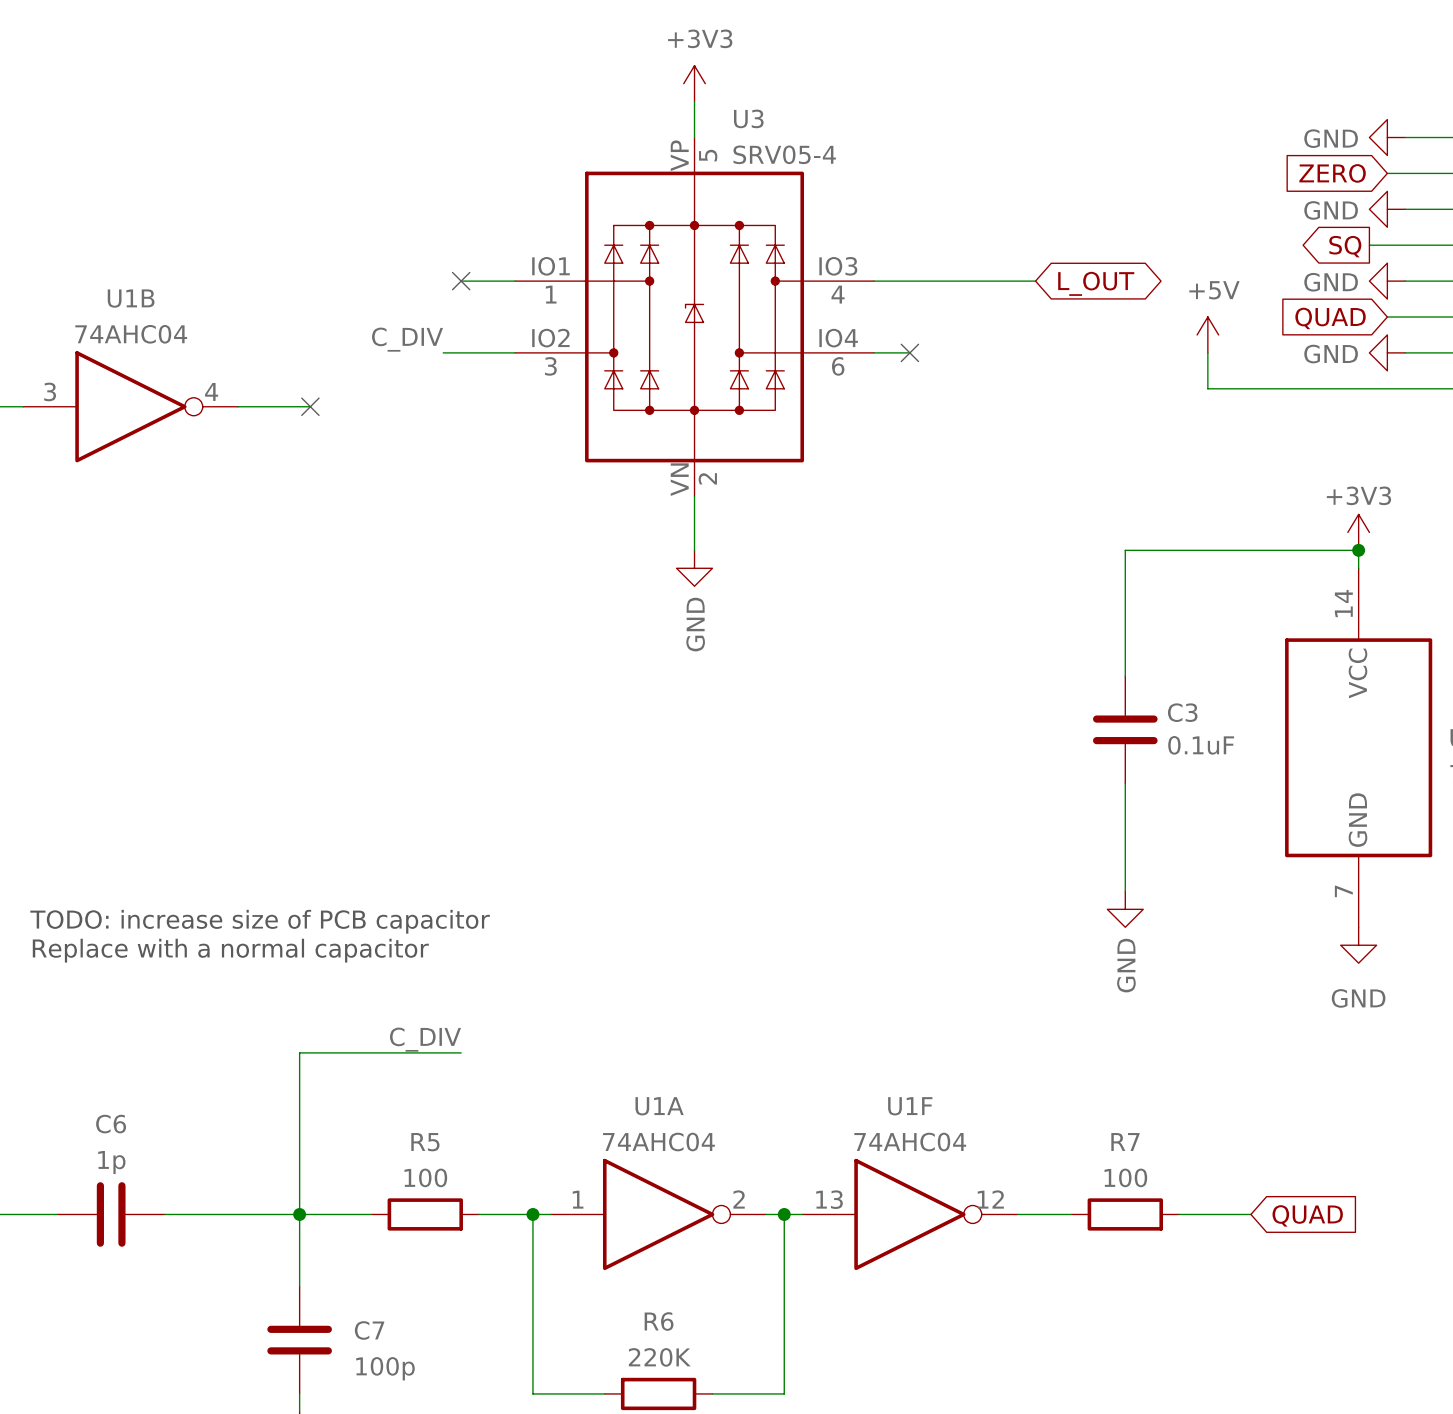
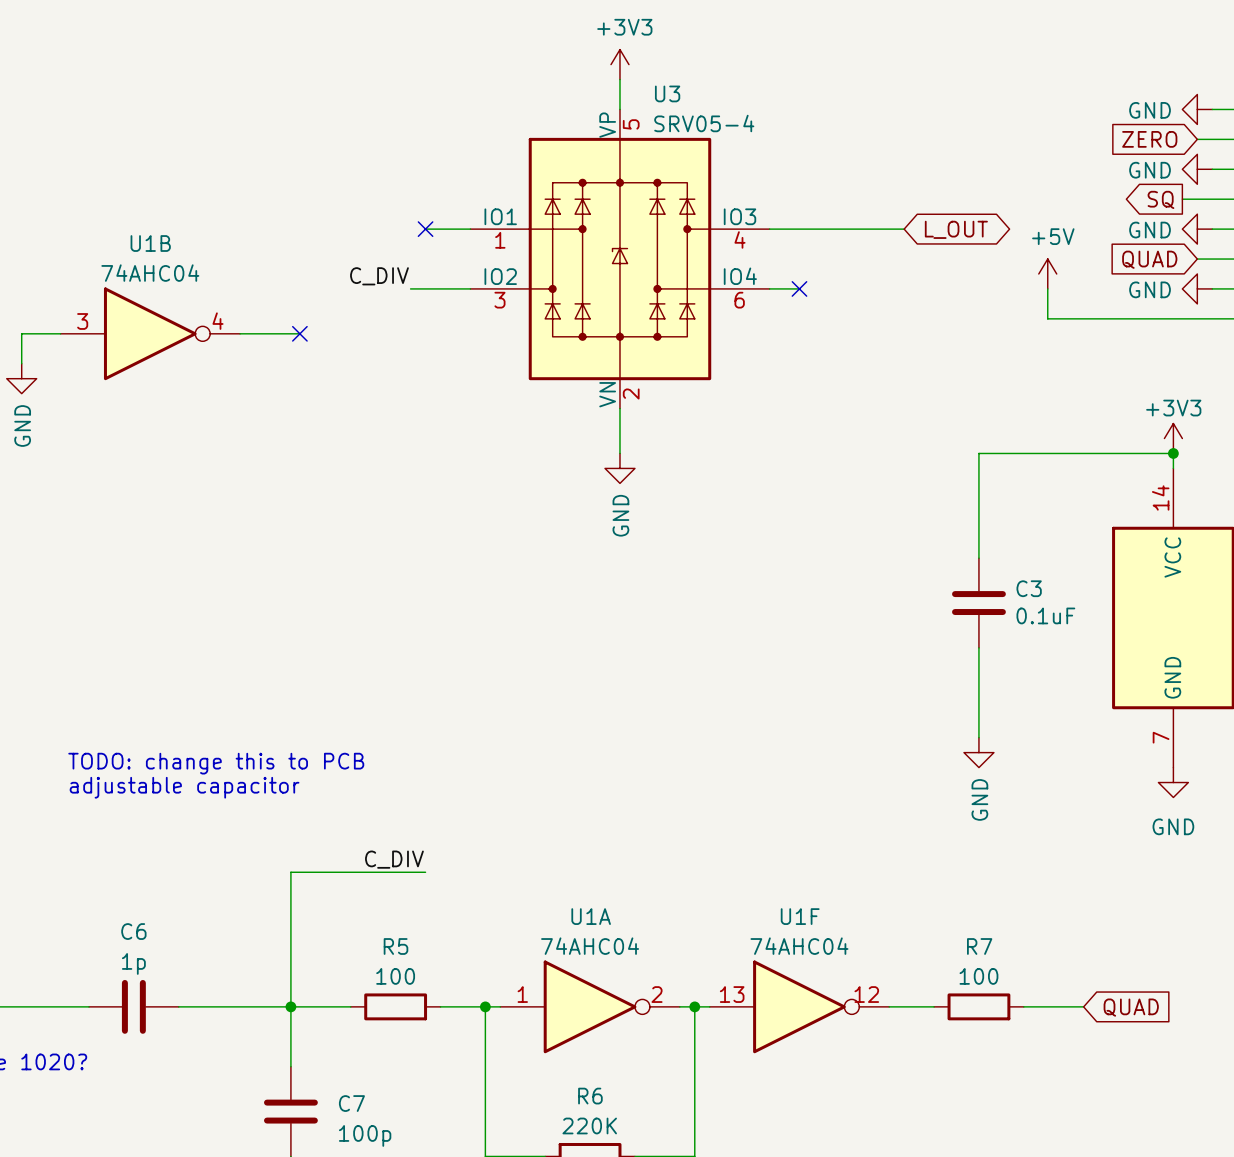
text: TODO: increase size of PCB capacitor (260, 921) -> TODO: change this to PCB (216, 763)
text: Replace with a normal capacitor (230, 950) -> adjustable capacitor (184, 787)

